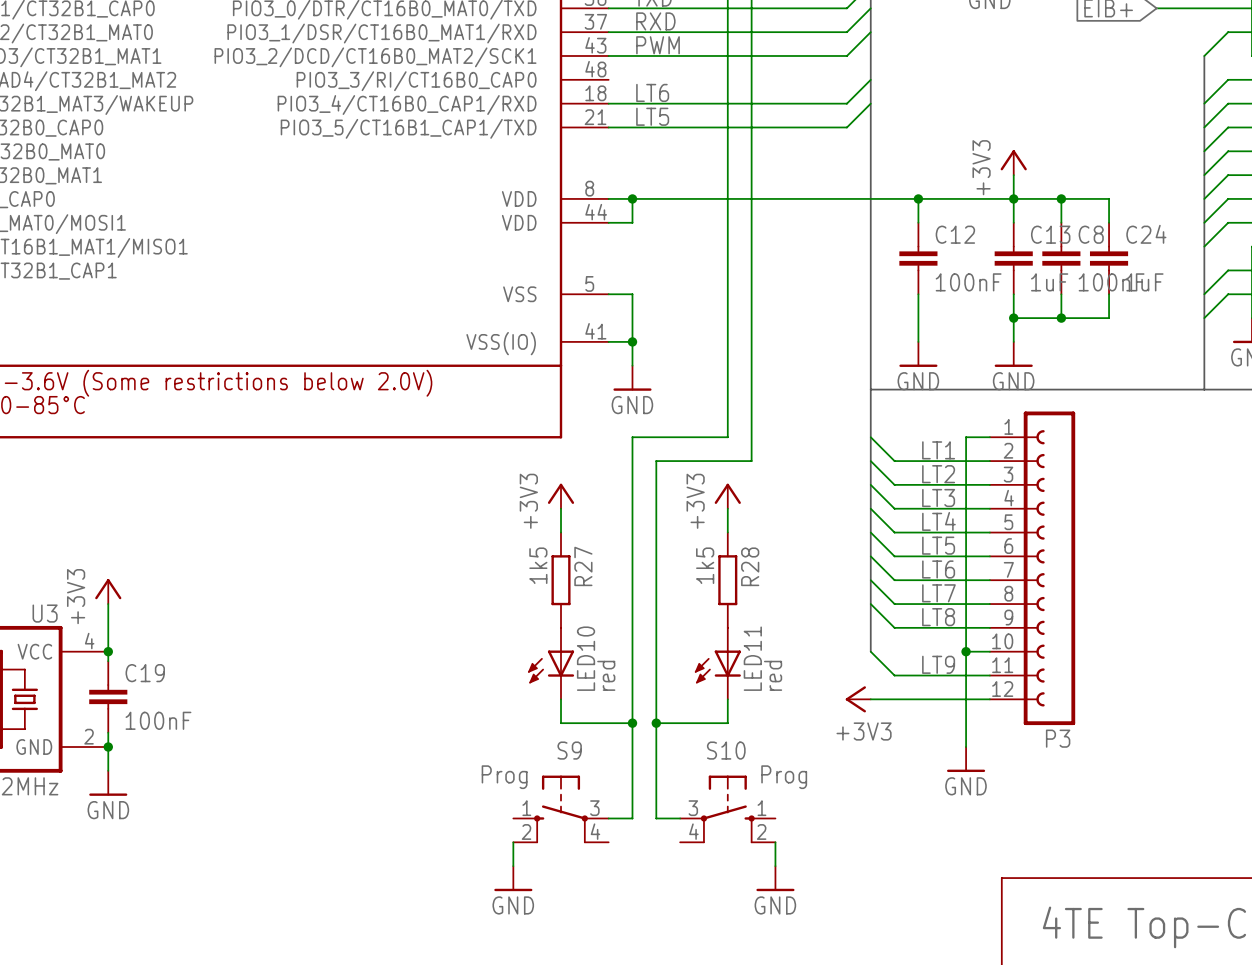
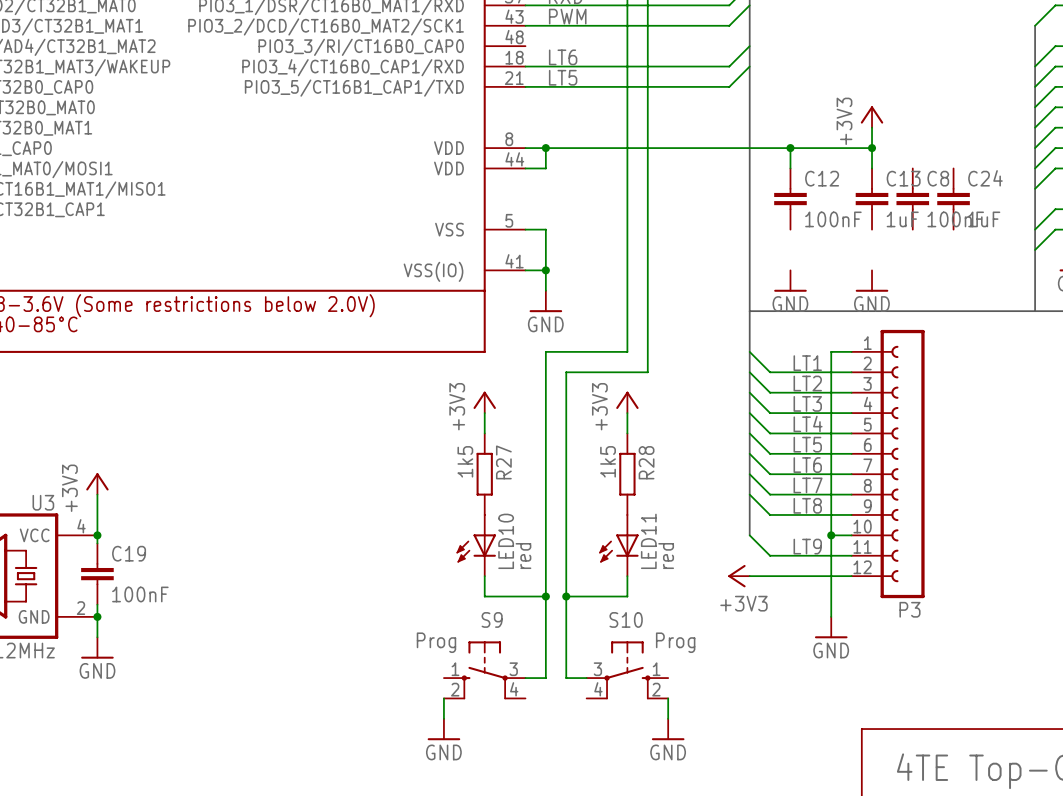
wire: (1013, 198) (1109, 198) (1109, 222) -> none
wire: (1061, 198) (1061, 222) -> none
junction: (1061, 198) -> none
wire: (918, 294) (918, 341) -> none
wire: (1013, 294) (1013, 341) -> none
wire: (1061, 294) (1061, 318) -> none
wire: (1109, 294) (1109, 318) (1013, 318) -> none
junction: (1013, 318) -> none
junction: (1061, 318) -> none

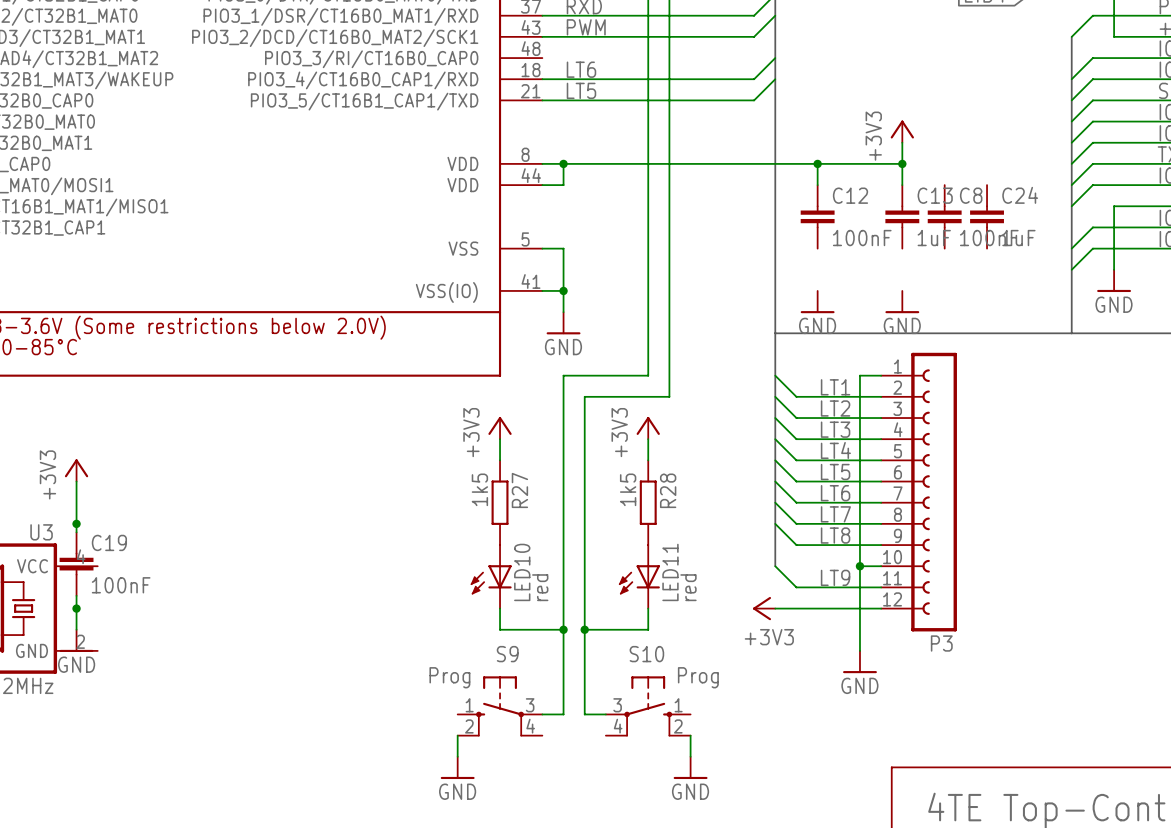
power symbol position: +3V3 (97, 483) -> +3V3 (76, 470)
junction: none -> (76, 523)
wire: (97, 494) (97, 543) -> (76, 481) (76, 532)
junction: (97, 535) -> none
C19 position: (97, 574) -> (76, 564)
junction: none -> (76, 608)
wire: (97, 604) (97, 637) -> (76, 595) (76, 629)
junction: (97, 616) -> none
power symbol position: GND (97, 647) -> GND (76, 640)

